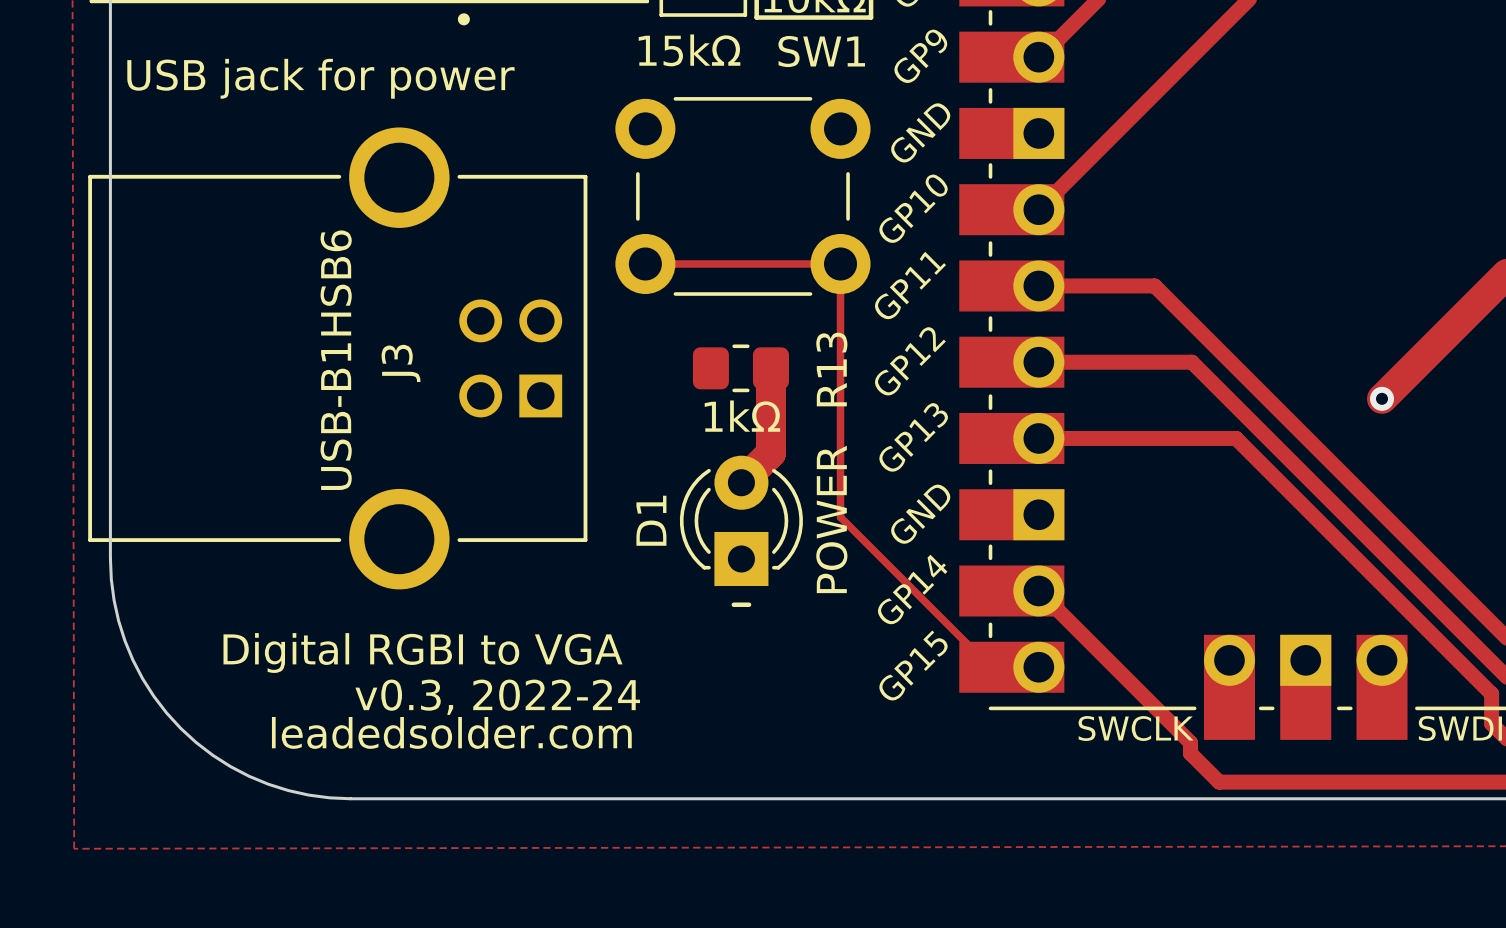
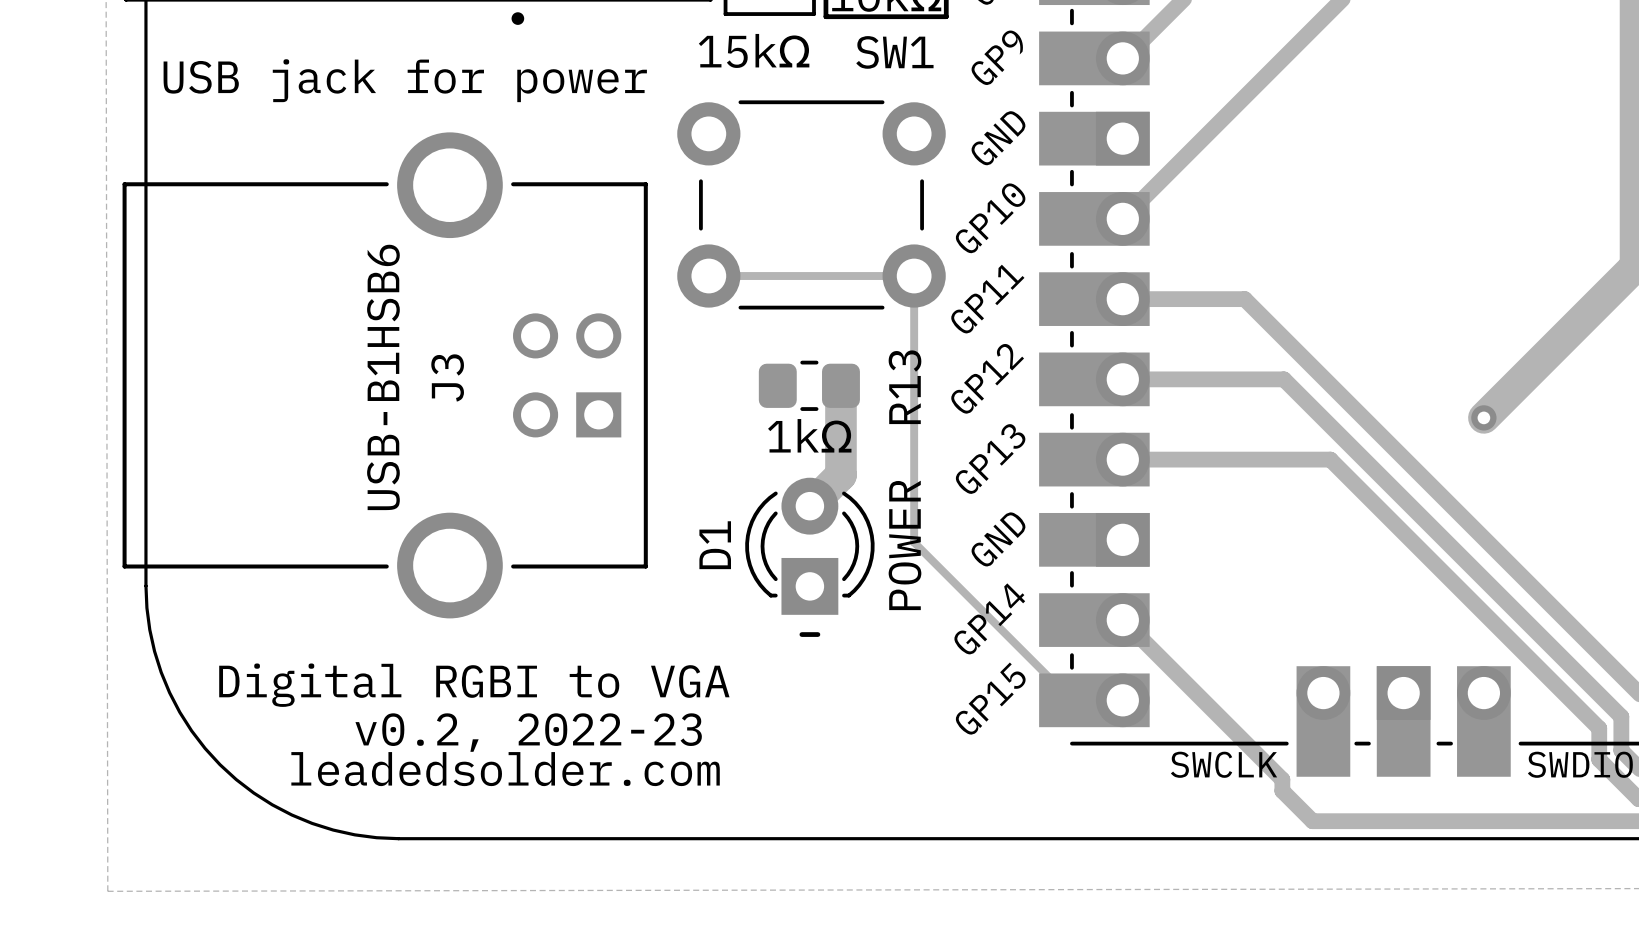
text: v0.3, 2022-24 (497, 697) -> v0.2, 2022-23 (528, 732)

